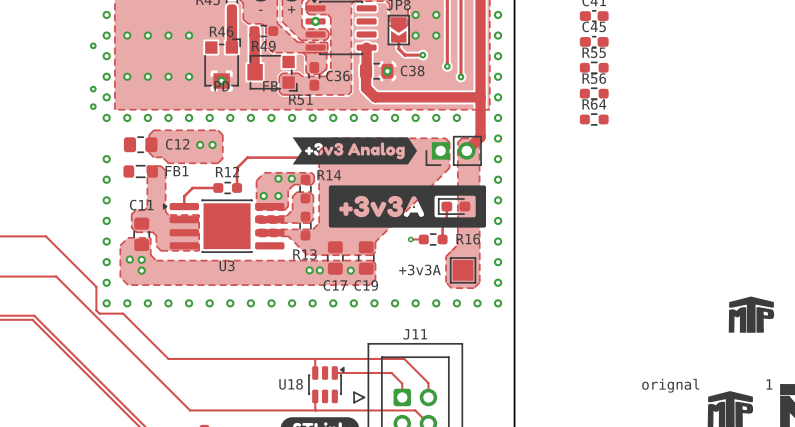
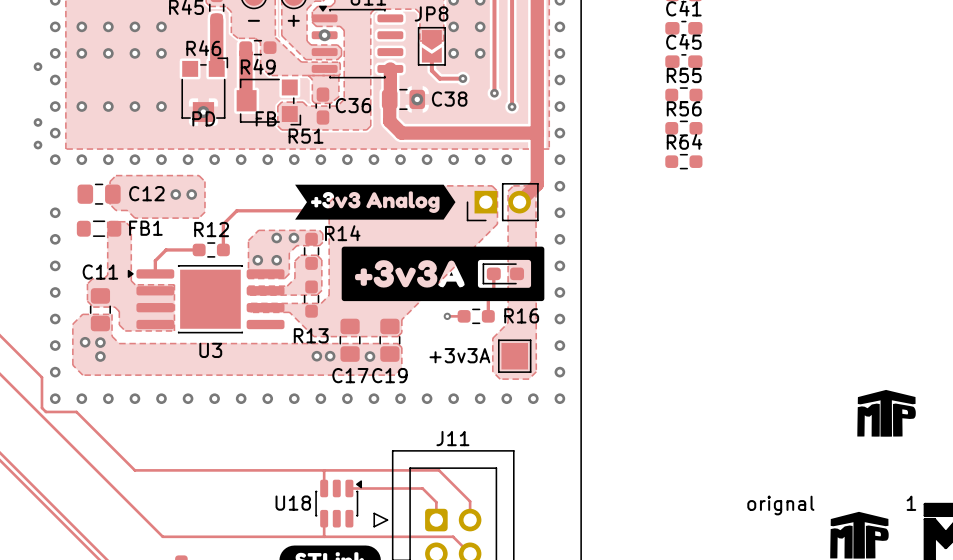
via: none -> (81, 26)
via: none -> (108, 26)
via: none -> (134, 26)
via: none -> (161, 26)

